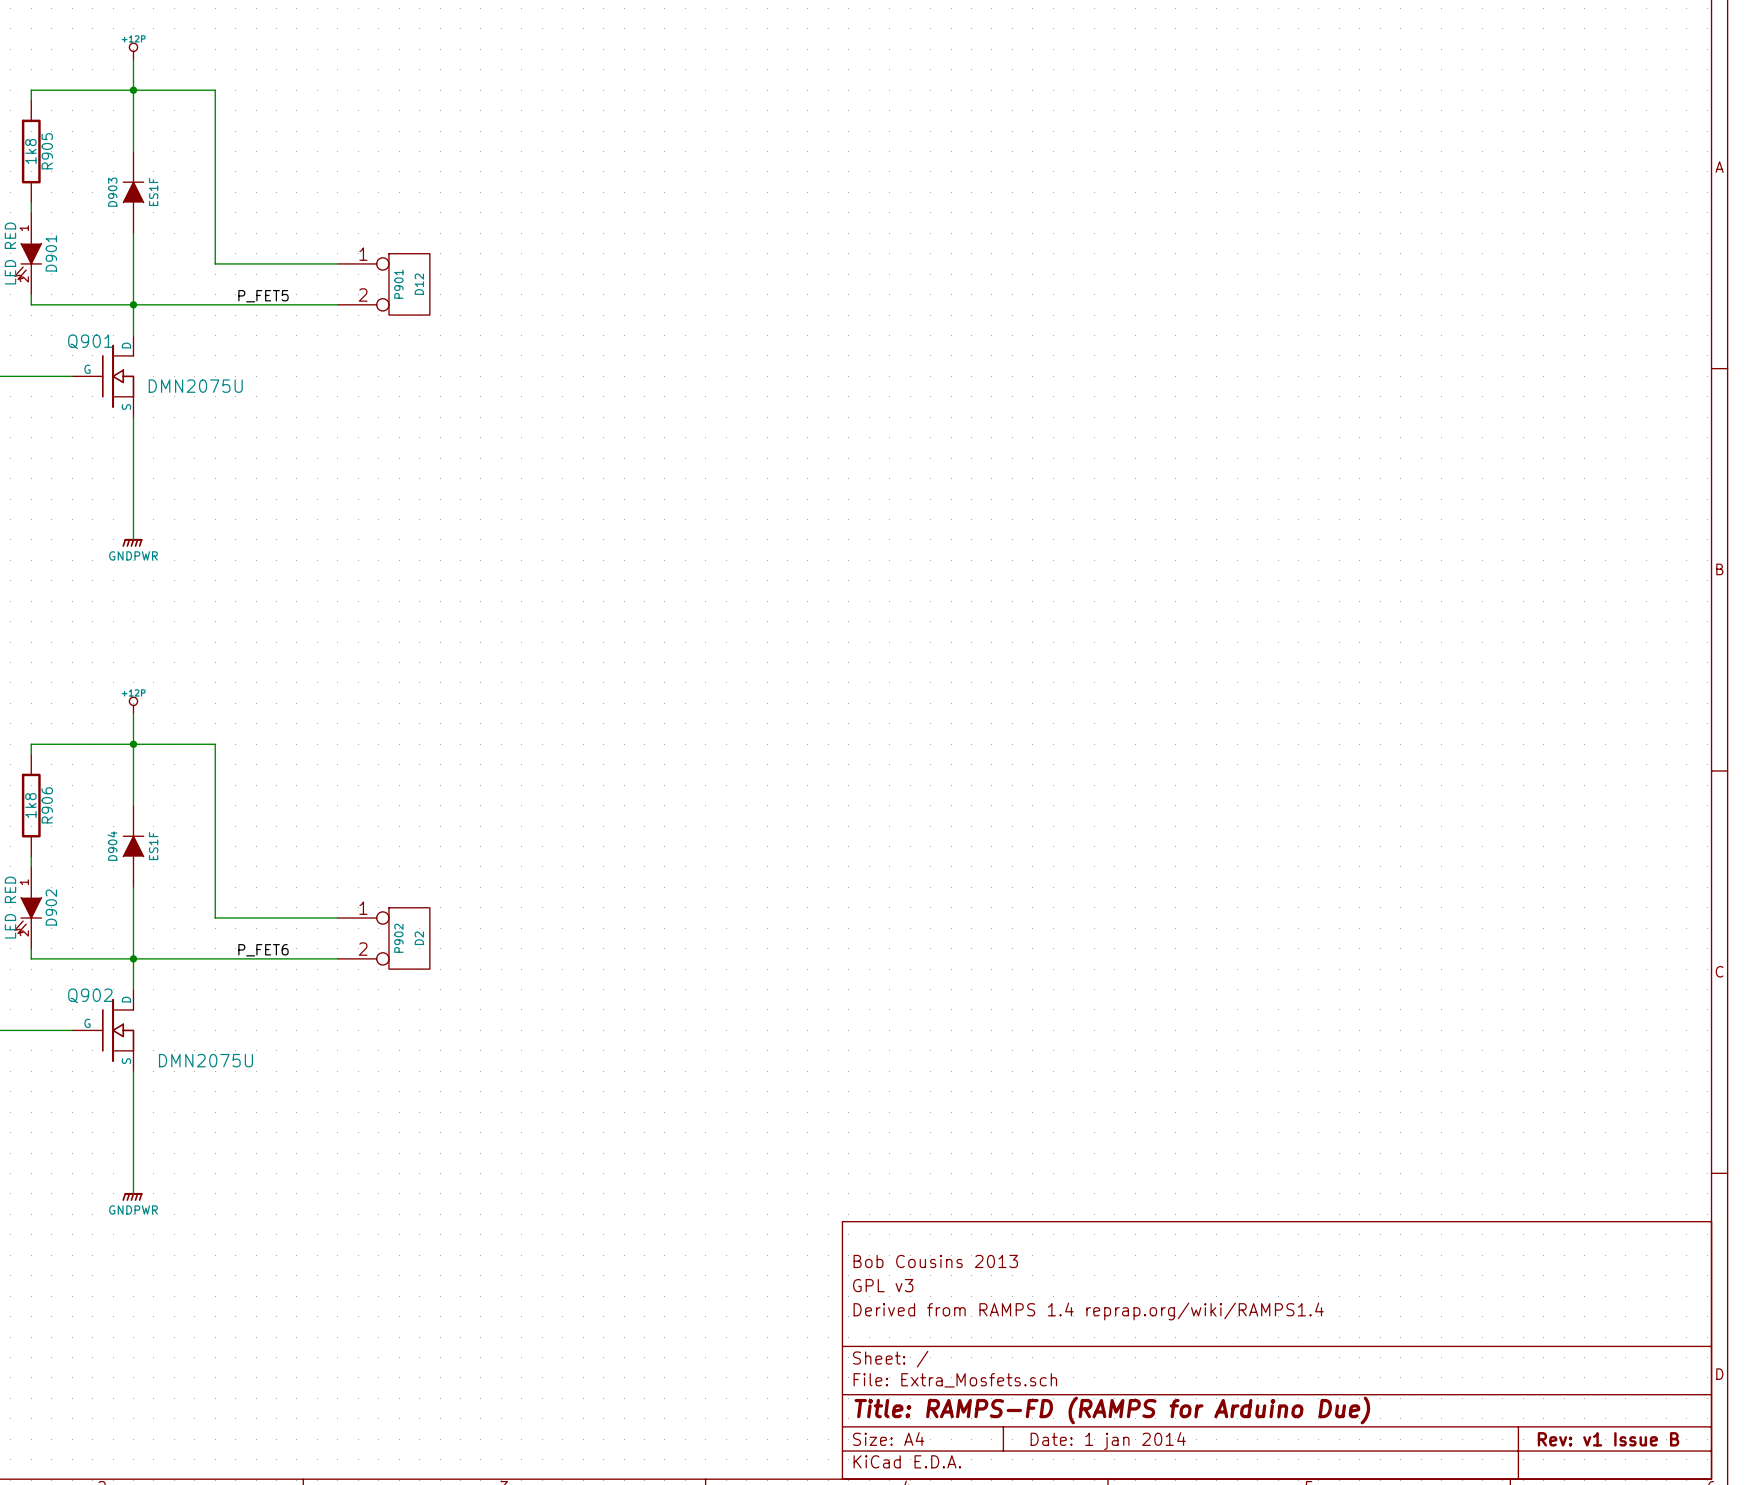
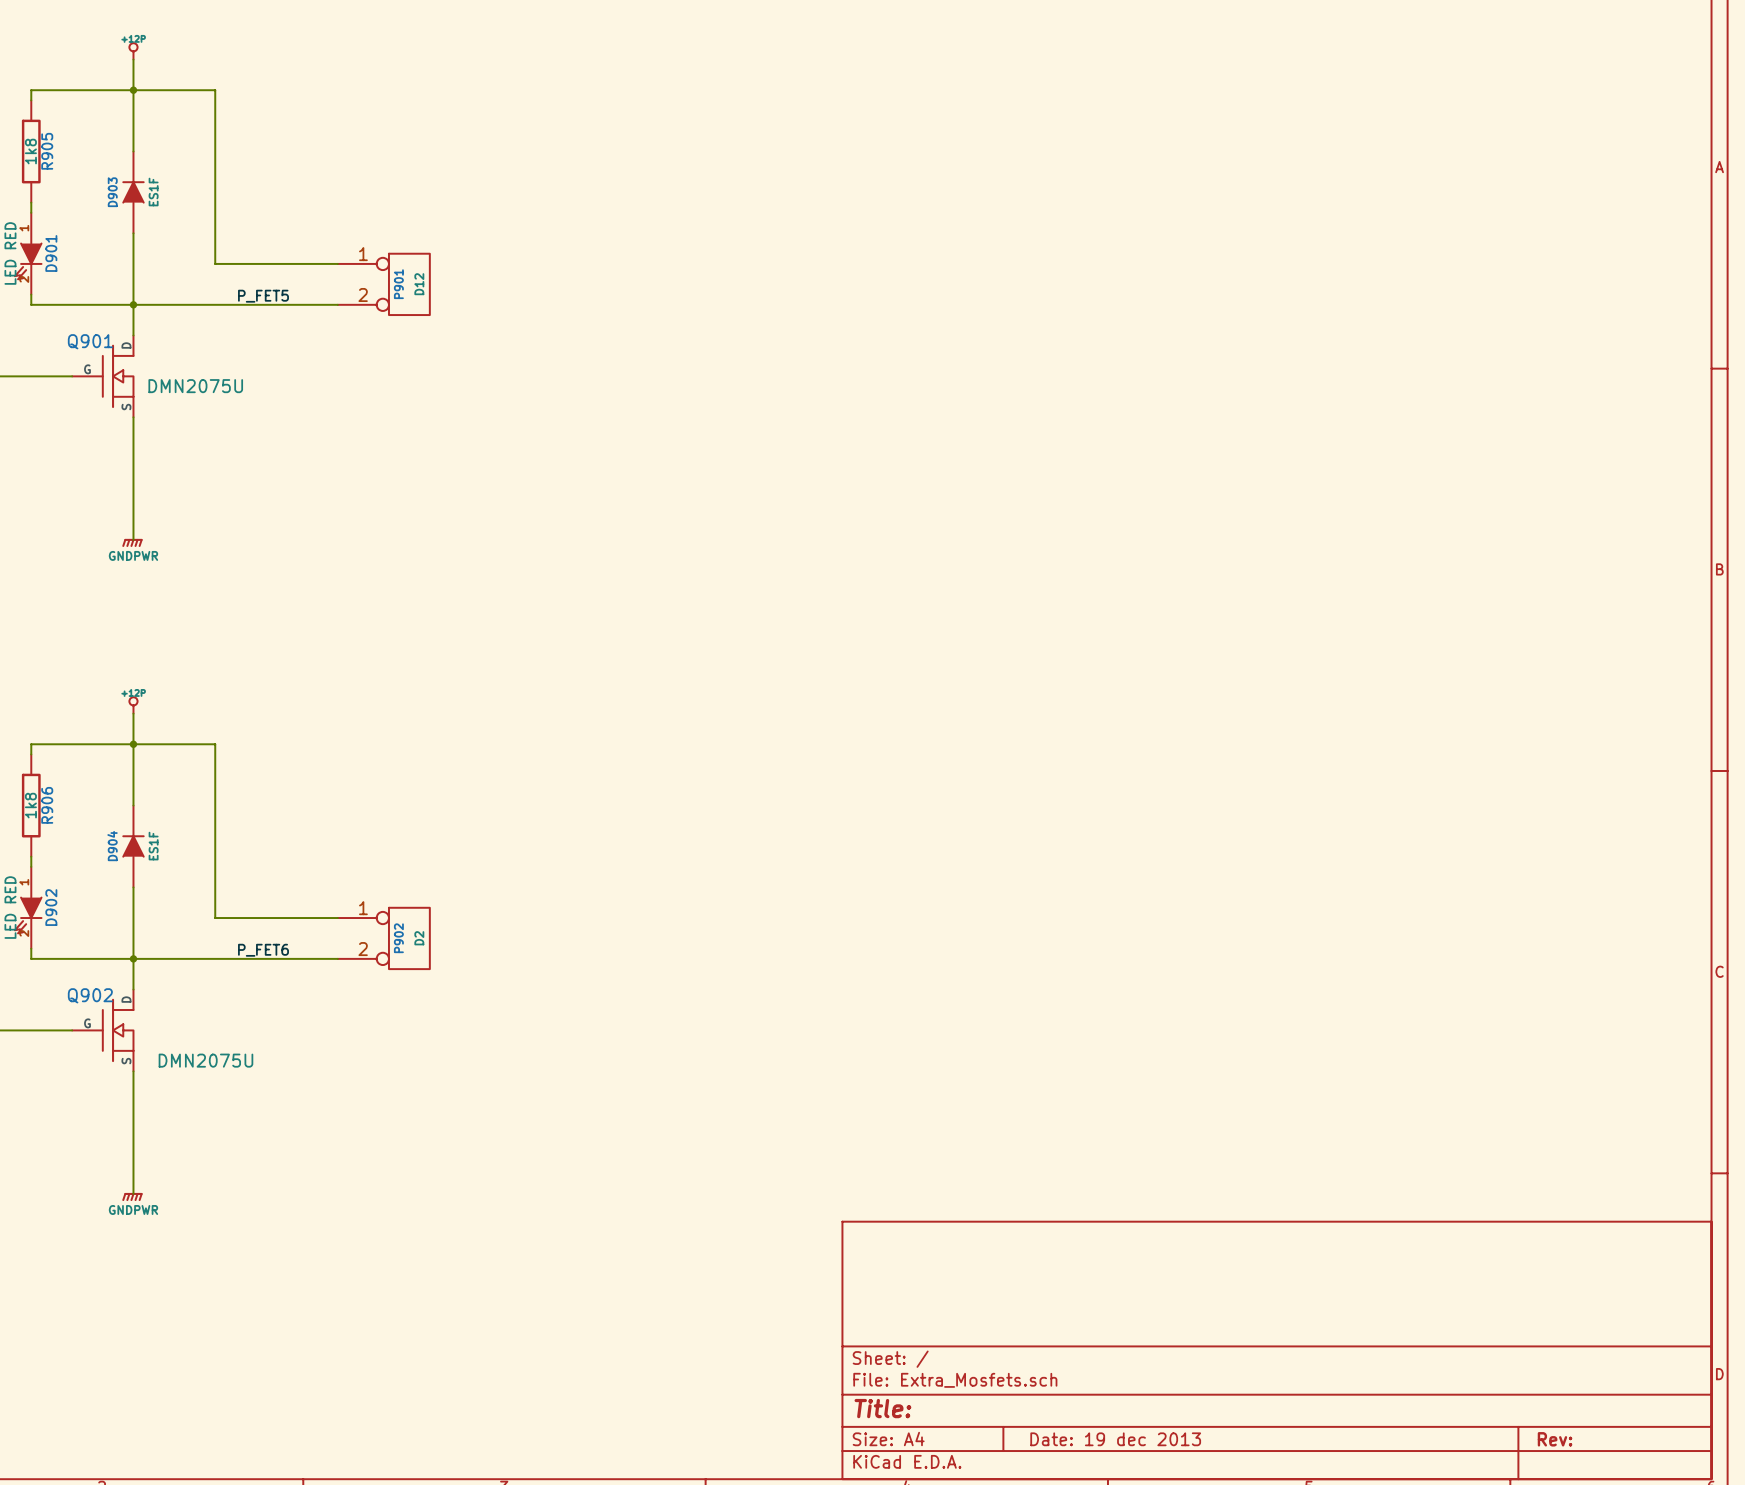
title block: Bob Cousins 2013 (935, 1261) -> none
title block: GPL v3 (883, 1285) -> none
title block: Derived from RAMPS 1.4 reprap.org/wiki/RAMPS1.4 (1088, 1311) -> none
title block: Title: RAMPS-FD (RAMPS for Arduino Due) (1112, 1410) -> Title: (882, 1408)
title block: Rev: v1 Issue B (1608, 1439) -> Rev: (1555, 1439)
title block: Date: 1 jan 2014 (1108, 1441) -> Date: 19 dec 2013 (1115, 1439)

